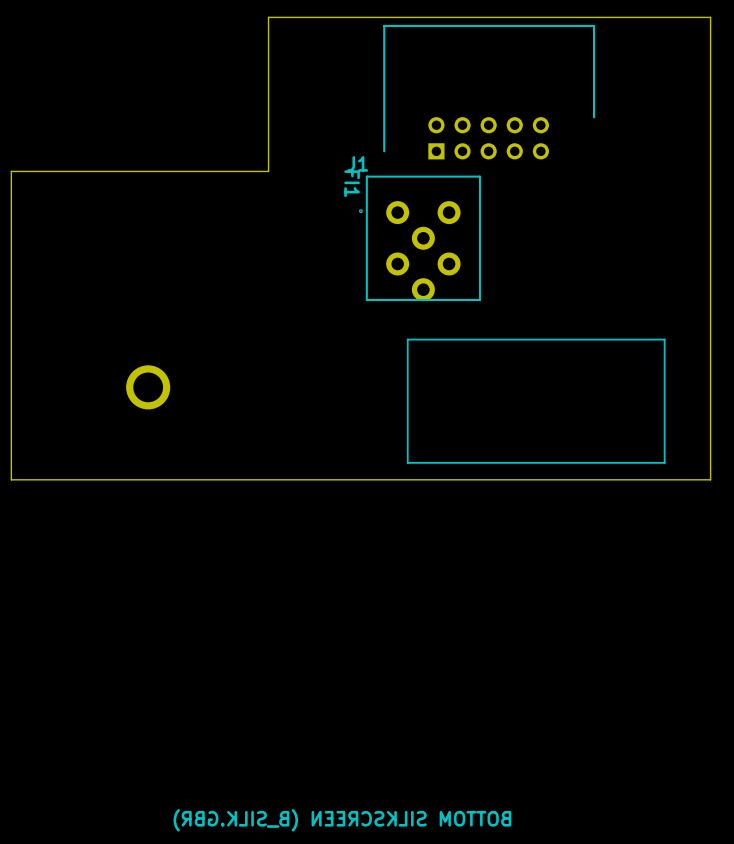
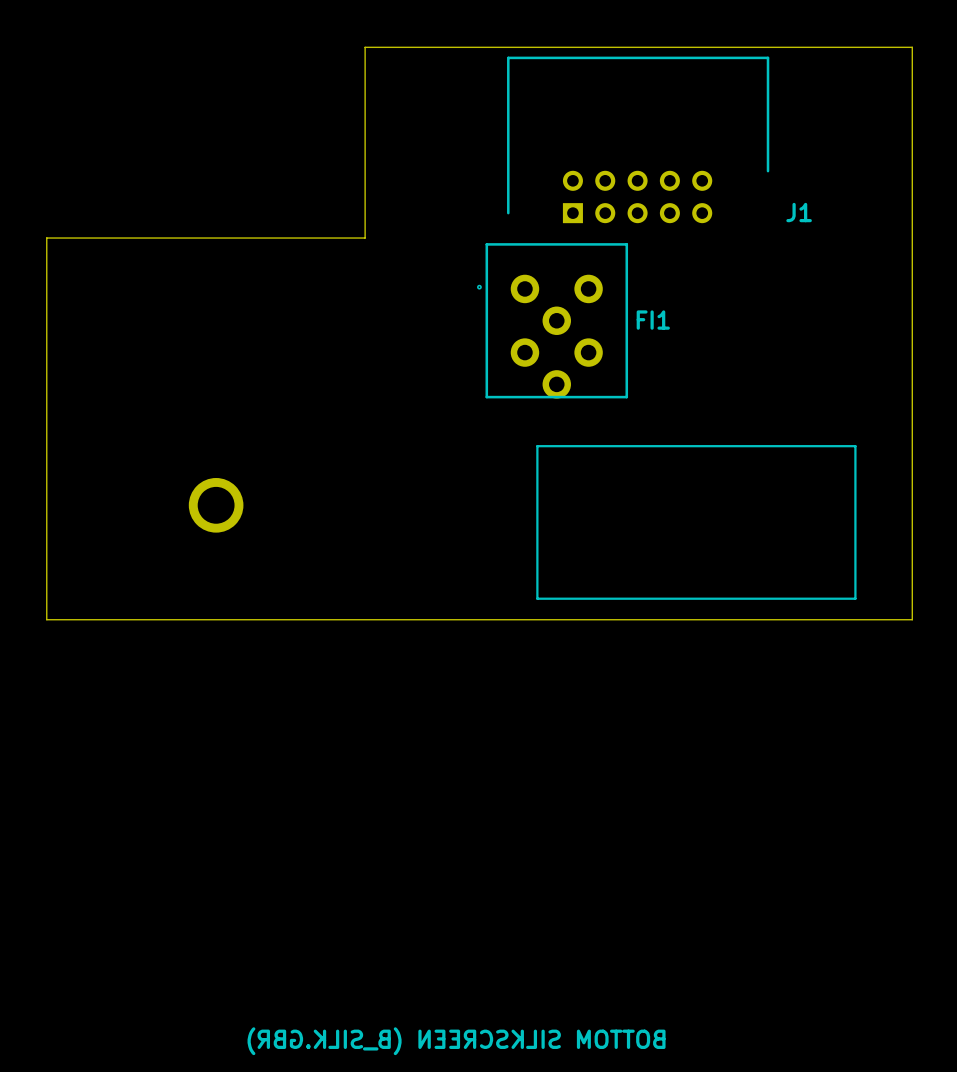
J1 name position: J1 (357, 163) -> J1 (799, 212)
FI1 name rotation: 0° (352, 183) -> 90° counterclockwise (653, 320)
FI1 name position: FI1 (352, 183) -> FI1 (653, 320)

